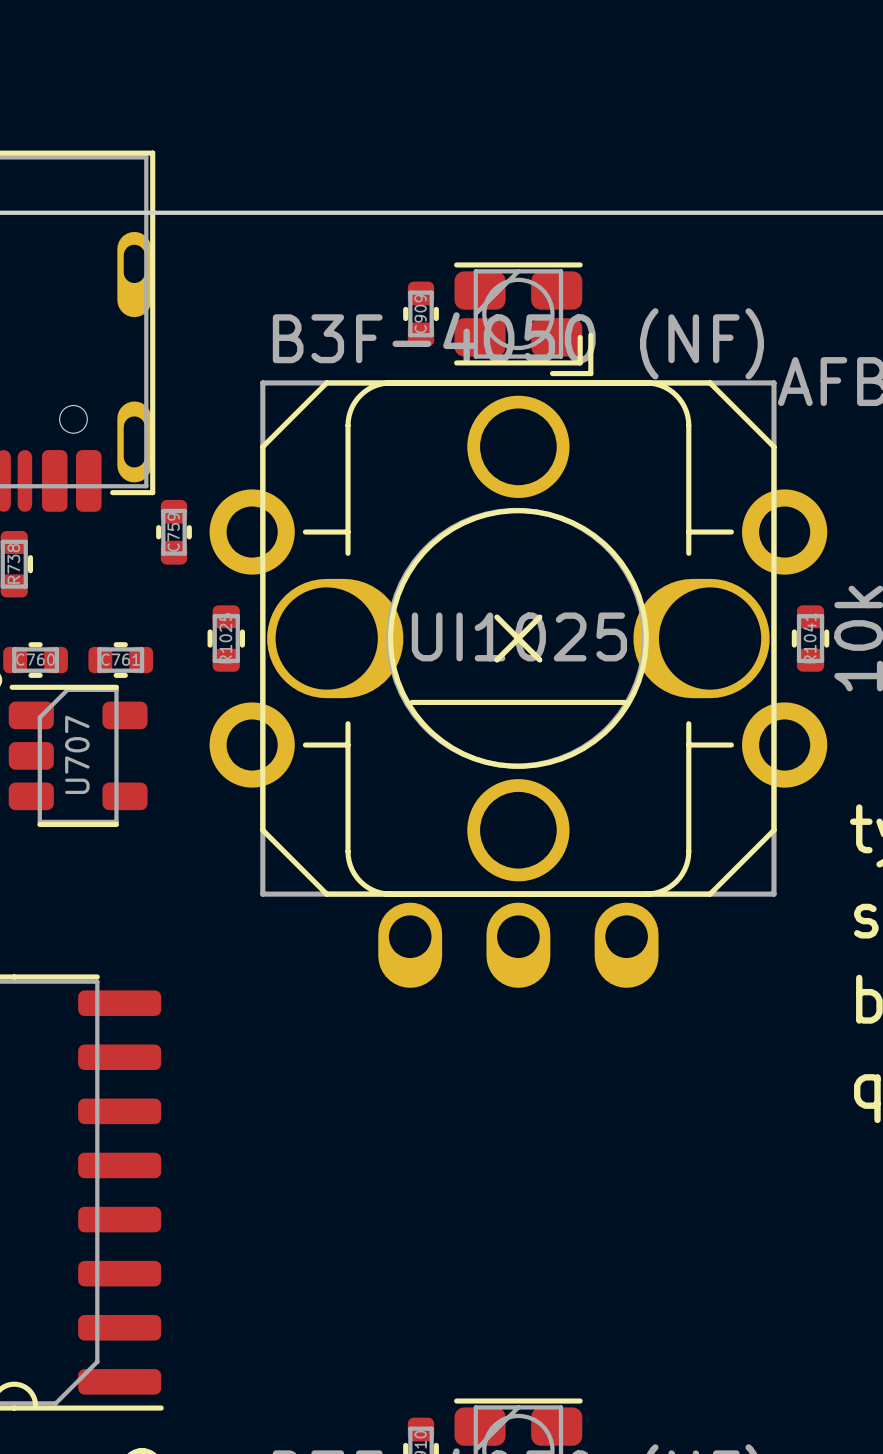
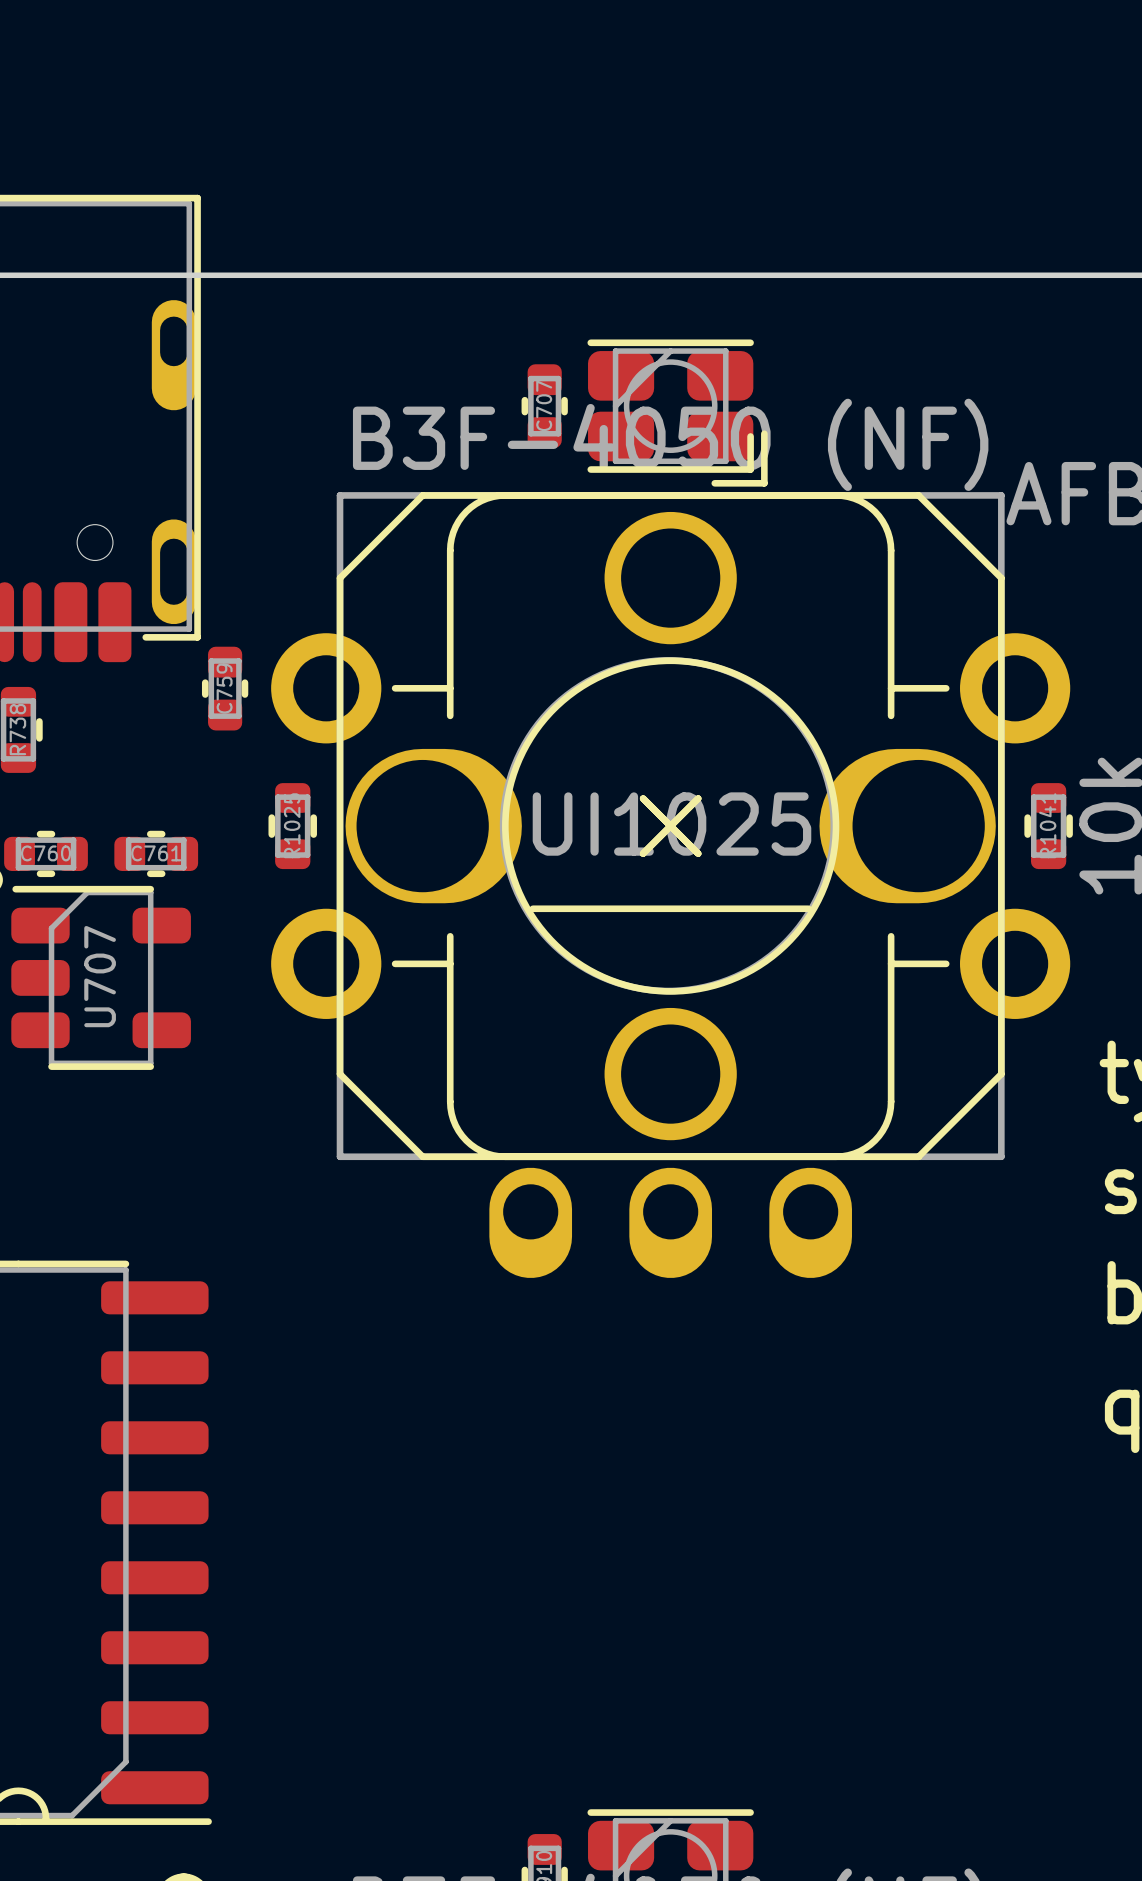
C909 name: C909 (420, 313) -> C707 (544, 405)

